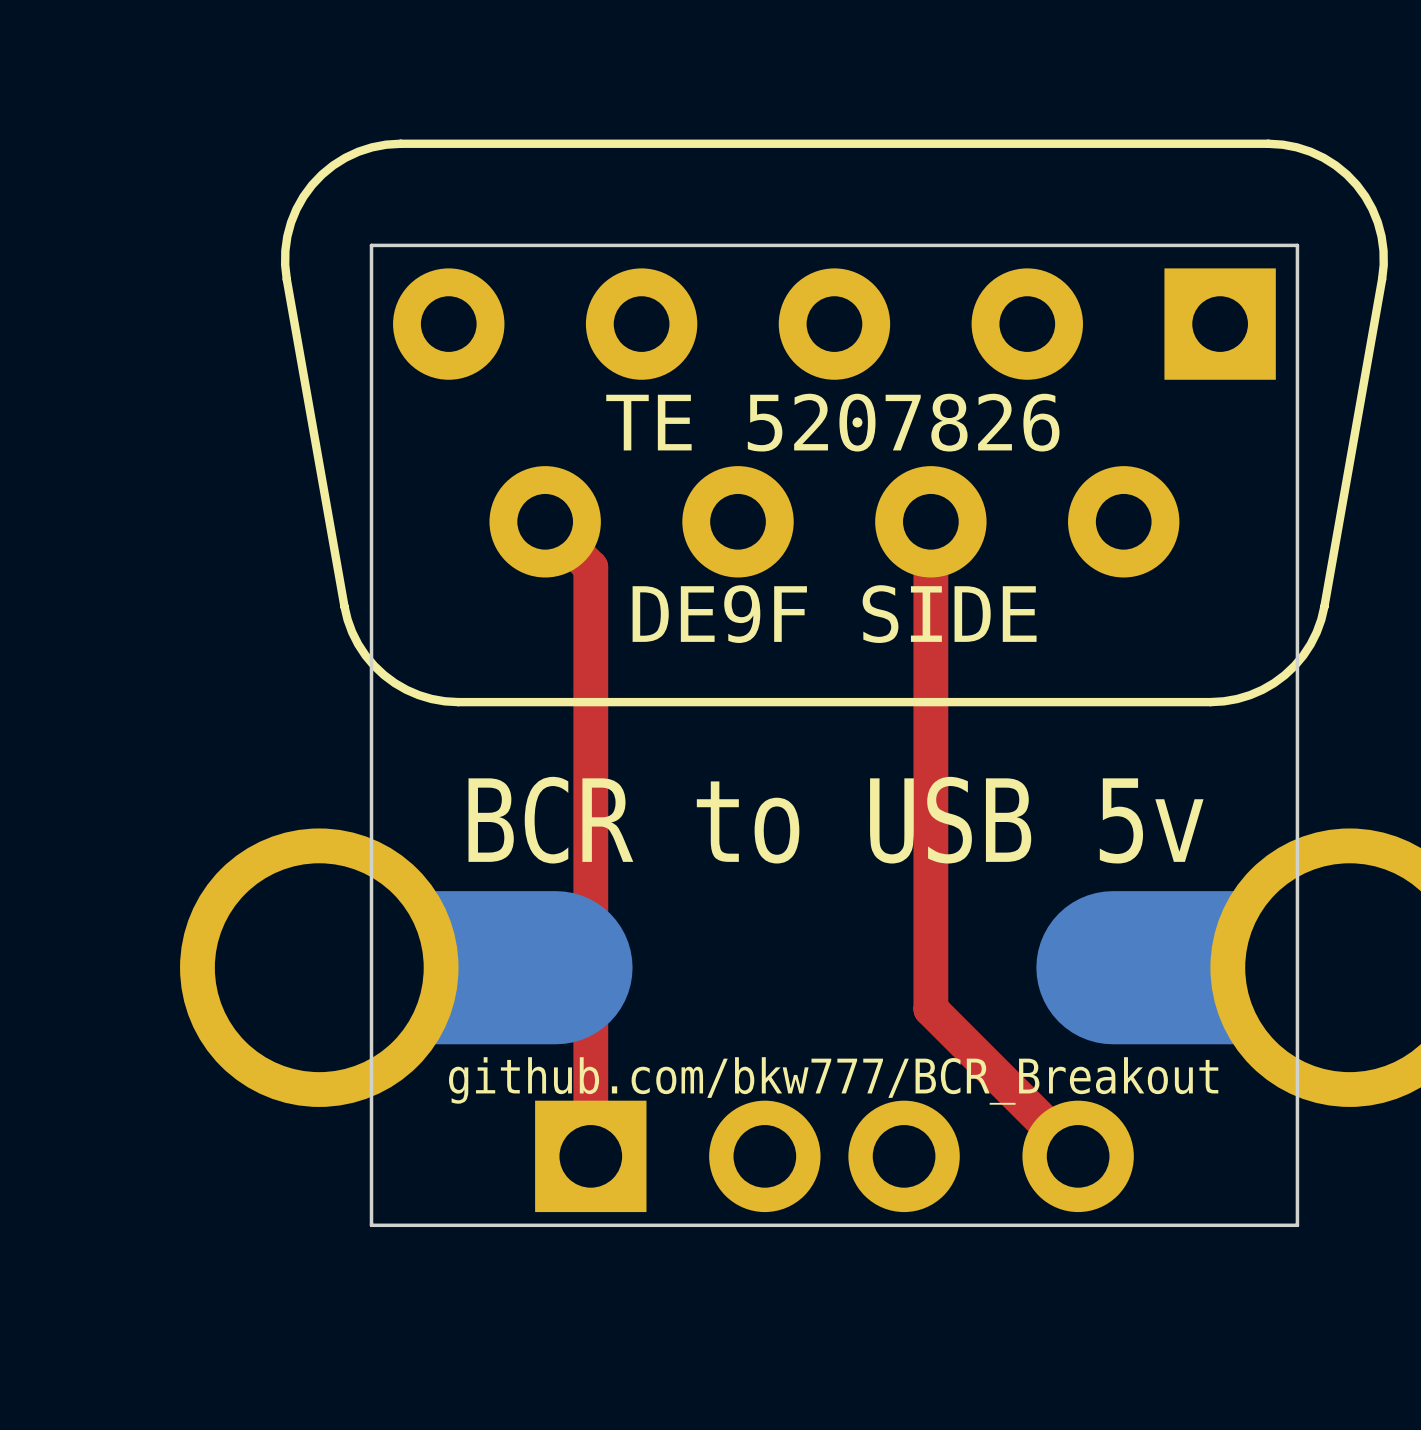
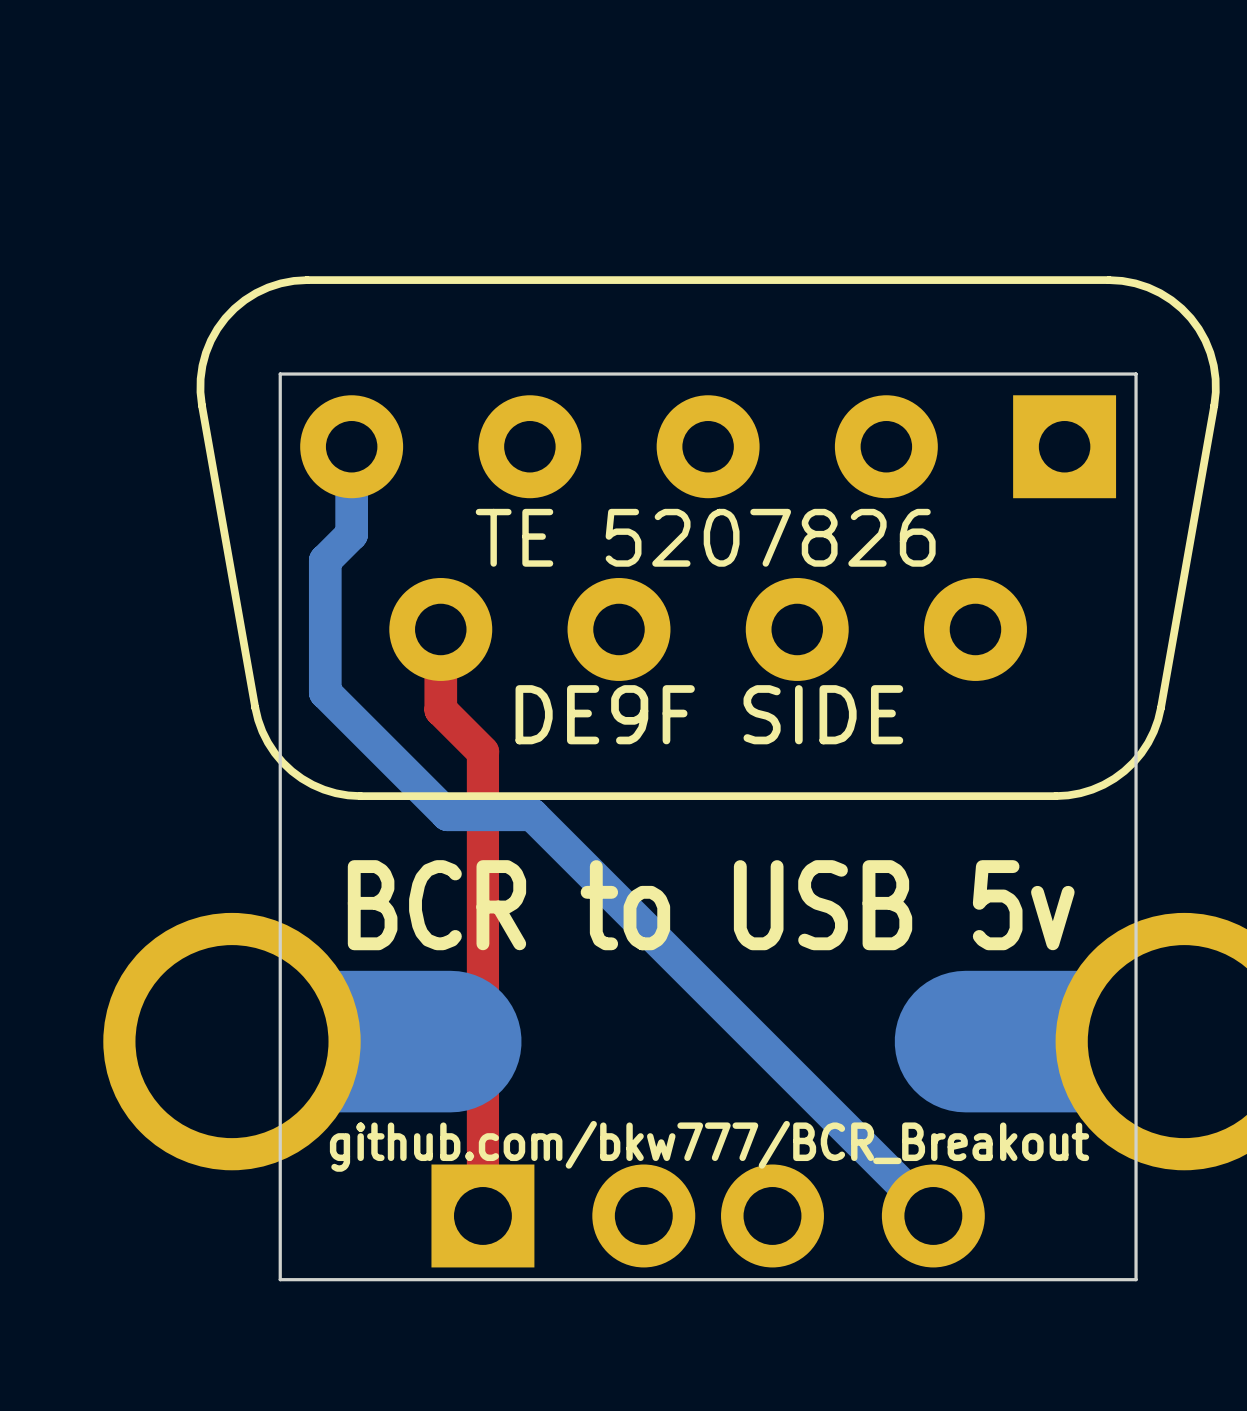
bottom track: none -> (351, 446) (351, 534) (325, 560) (325, 692) (447, 814) (532, 814) (933, 1215)
top track: (545, 521) (590, 567) (590, 654) -> (440, 629) (440, 709) (482, 752)
top track: (930, 521) (930, 1009) (1078, 1156) -> none

